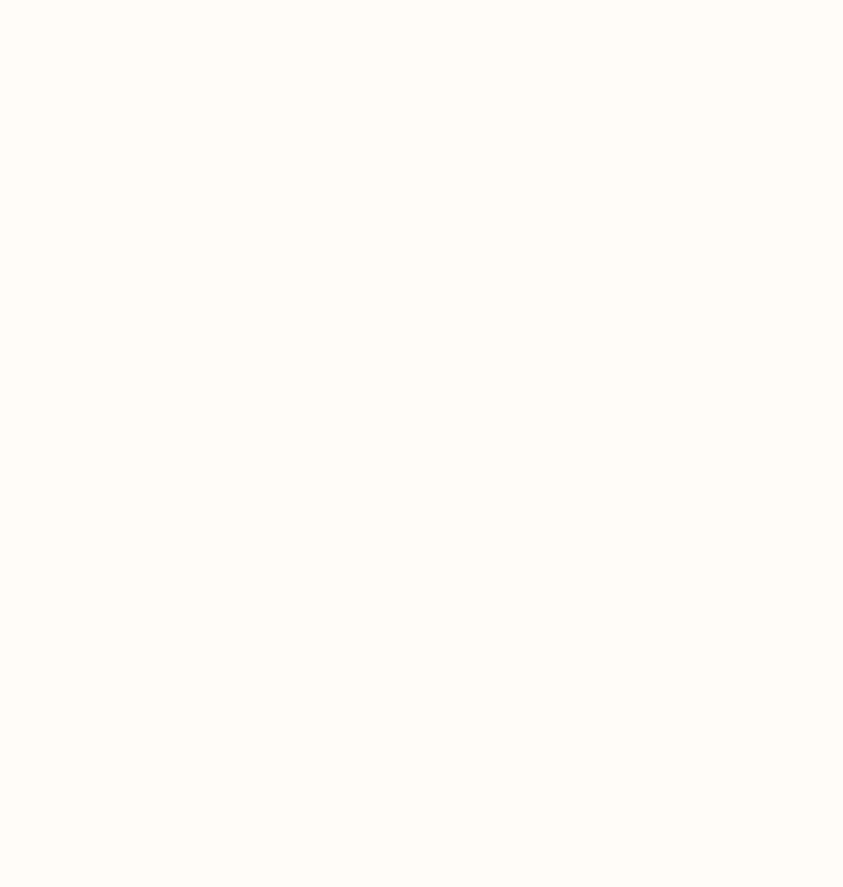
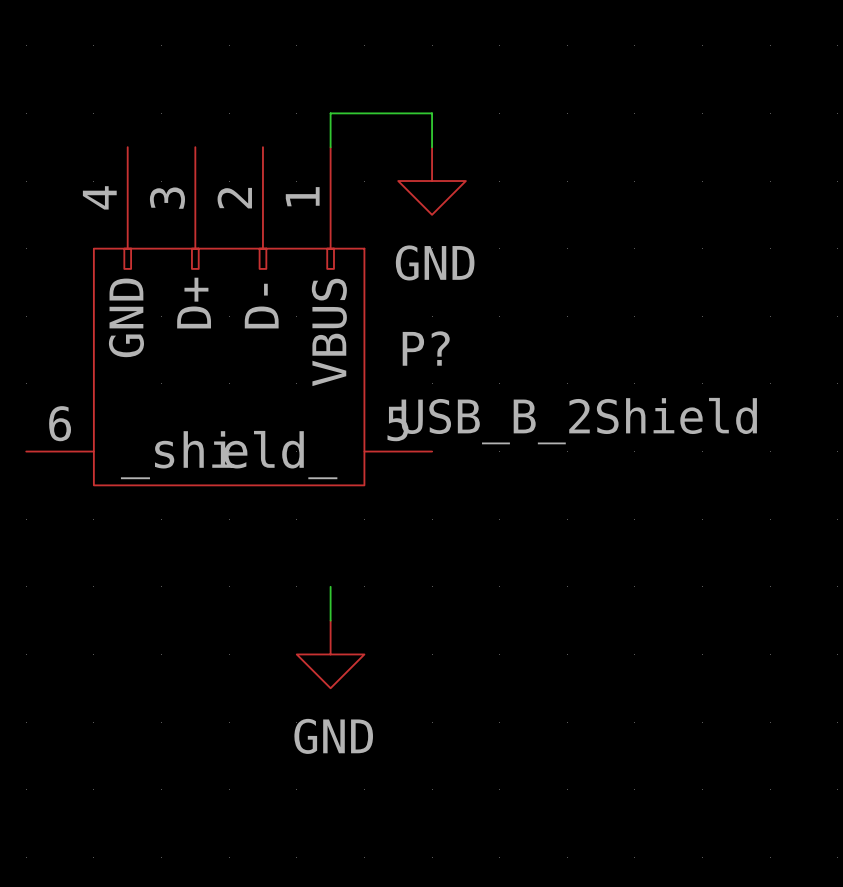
wire: none -> (330, 147) (330, 113) (432, 113) (432, 147)
power symbol: none -> GND (432, 181)
P?: none -> USB_B_2Shield (229, 316)
wire: none -> (330, 586) (330, 620)
power symbol: none -> GND (330, 654)

